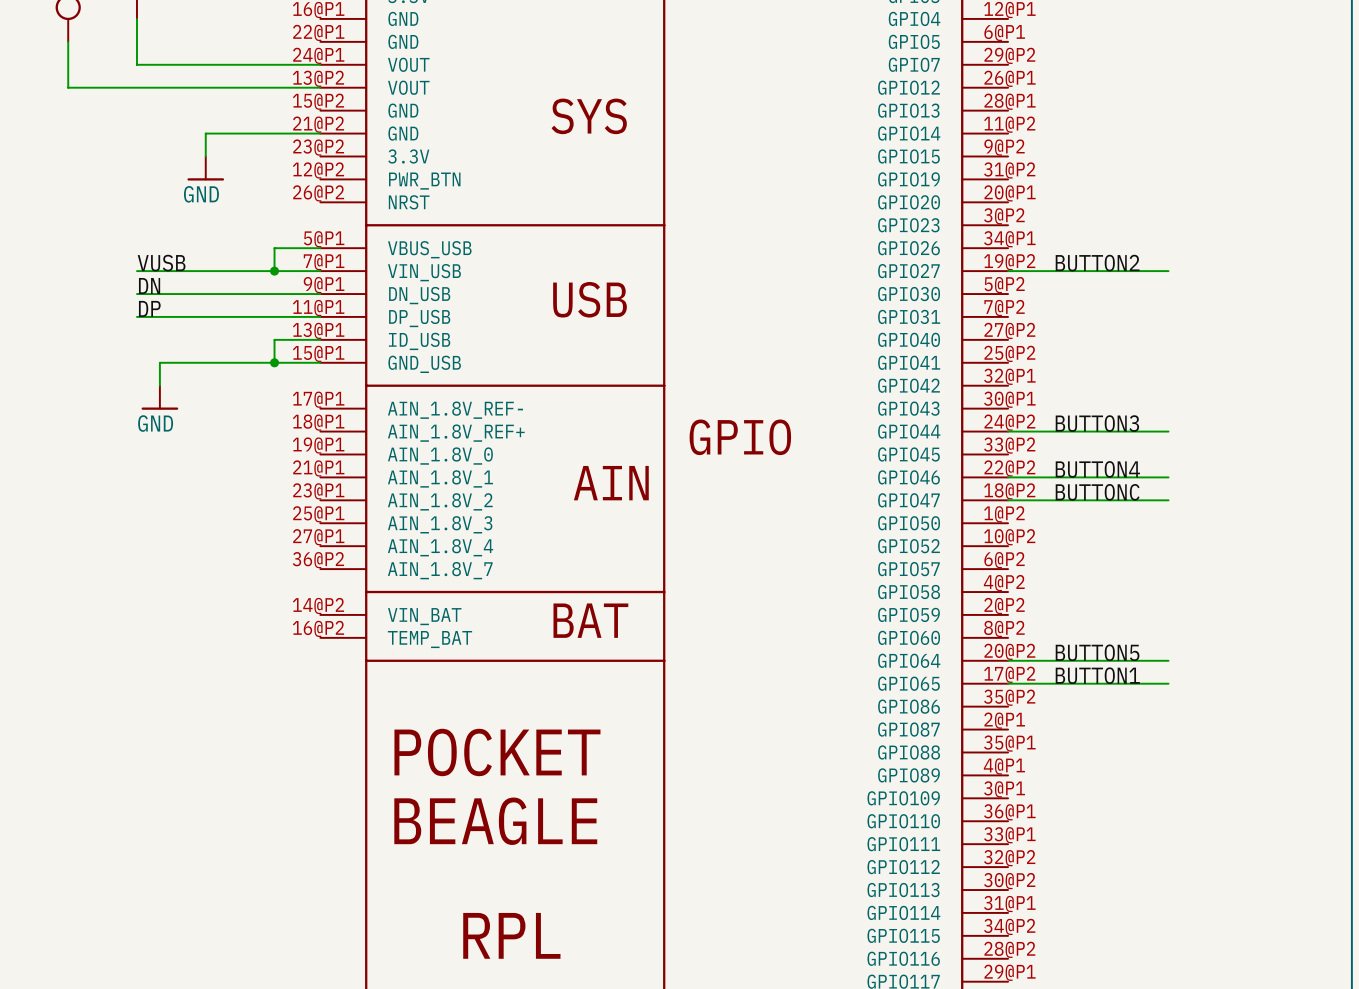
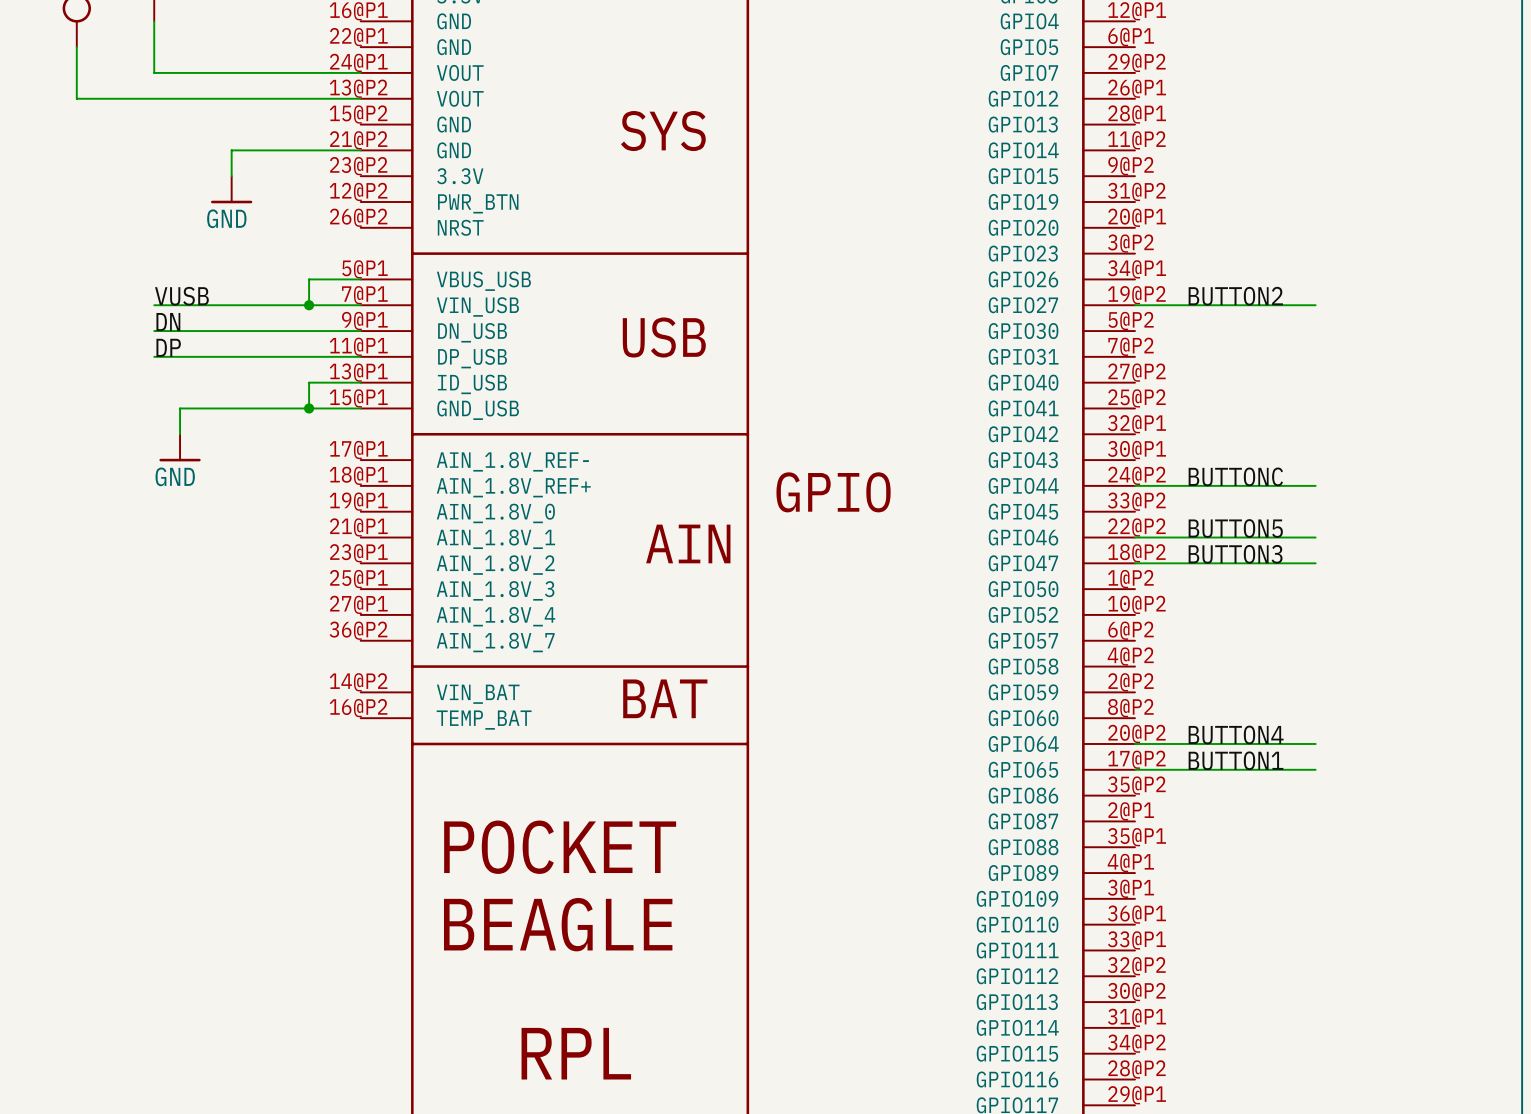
label: BUTTON3 (1097, 423) -> BUTTONC (1235, 476)
label: BUTTON4 (1097, 469) -> BUTTON5 (1235, 528)
label: BUTTONC (1097, 492) -> BUTTON3 (1235, 554)
label: BUTTON5 (1097, 652) -> BUTTON4 (1236, 734)

